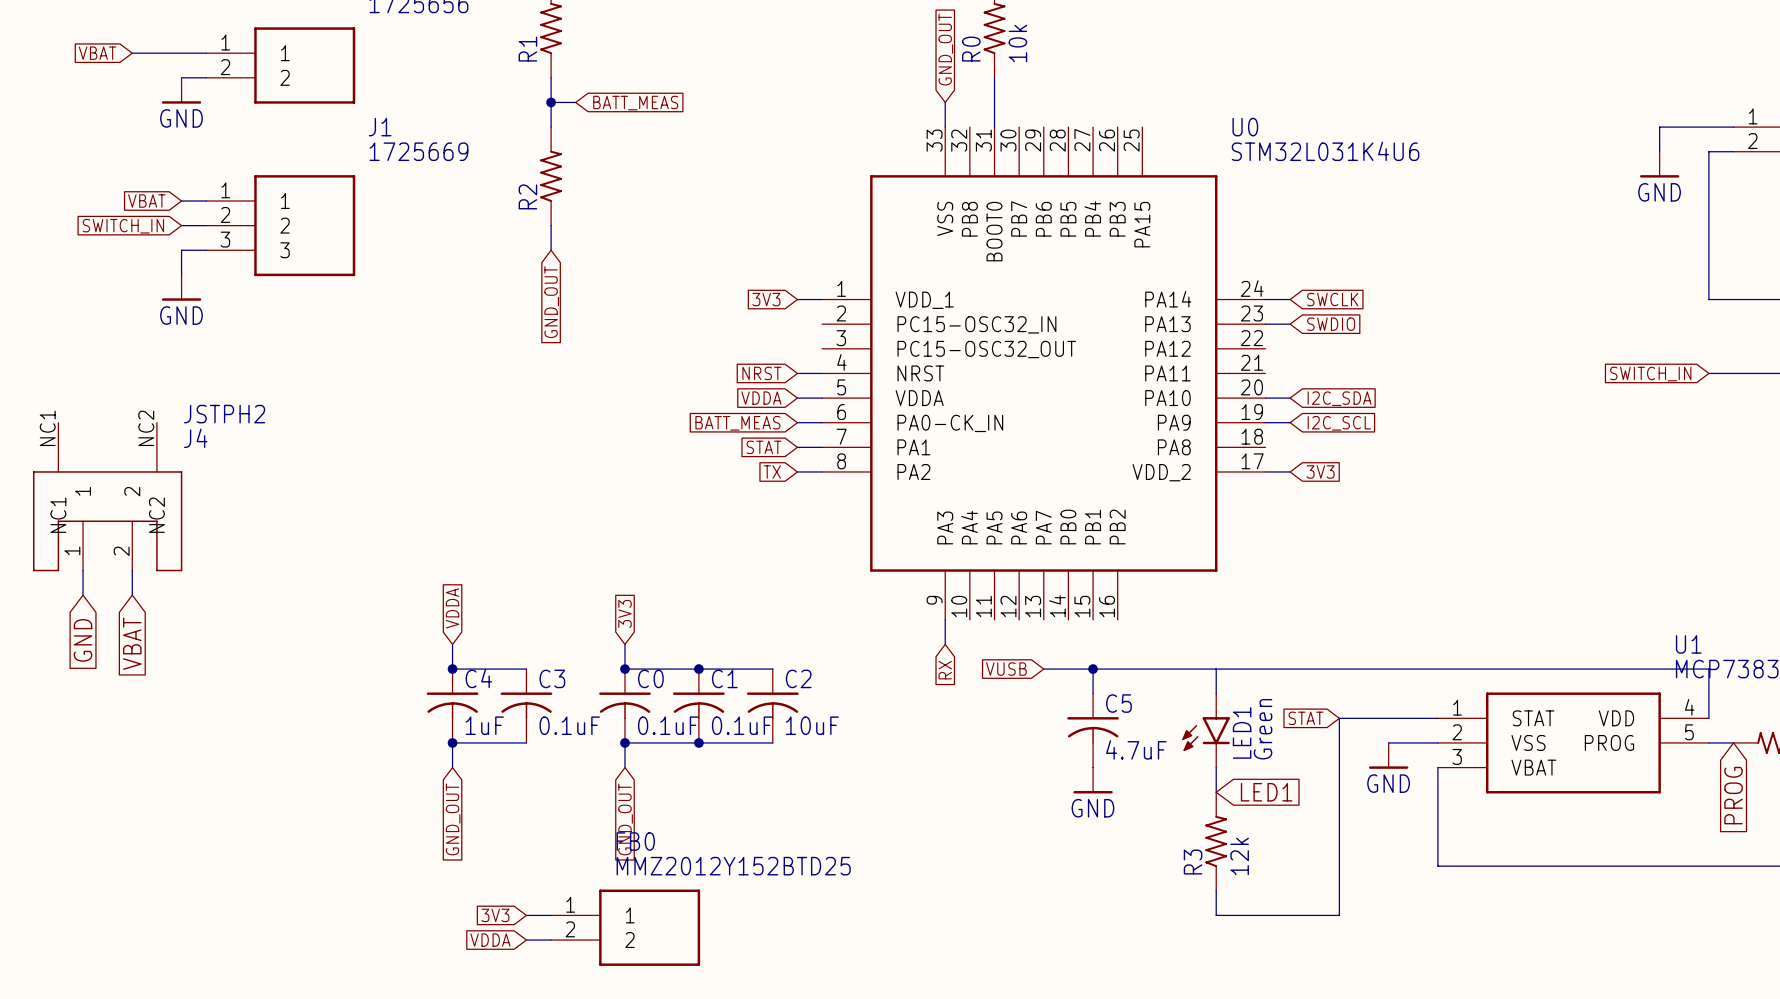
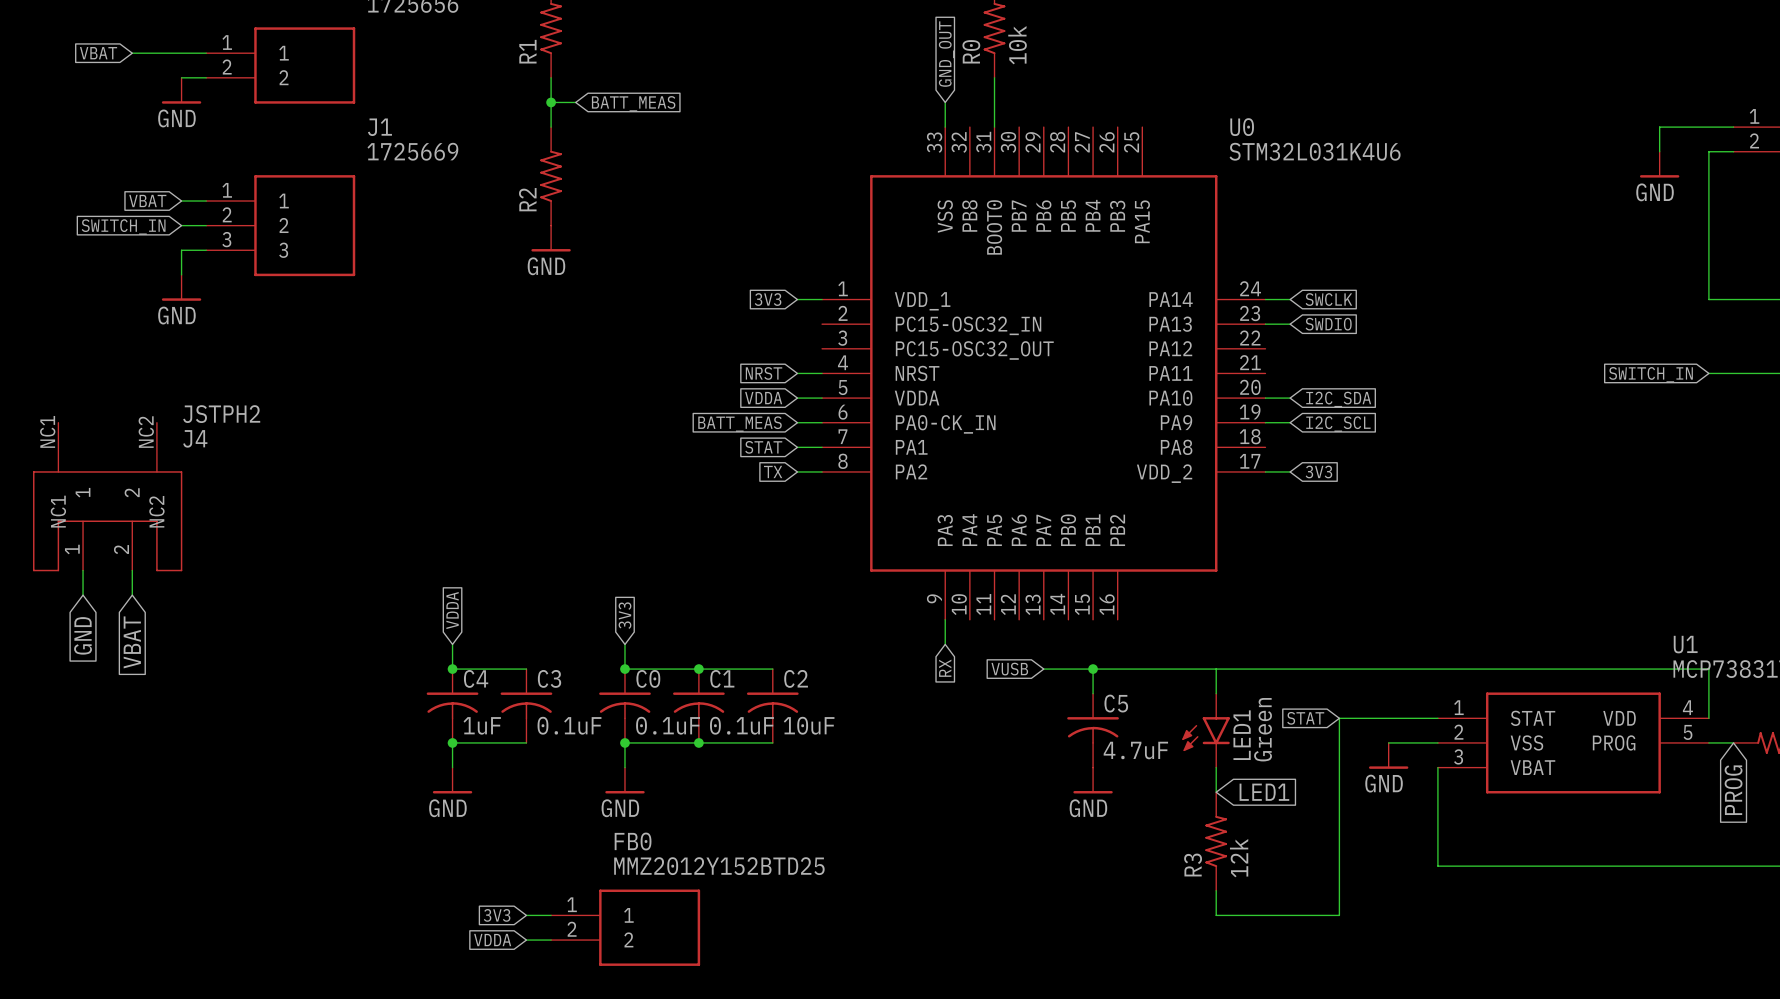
power symbol: none -> GND (551, 238)
global label: GND_OUT (551, 302) -> none
power symbol: none -> GND (452, 780)
power symbol: none -> GND (624, 780)
global label: GND_OUT (453, 819) -> none
global label: GND_OUT (625, 819) -> none

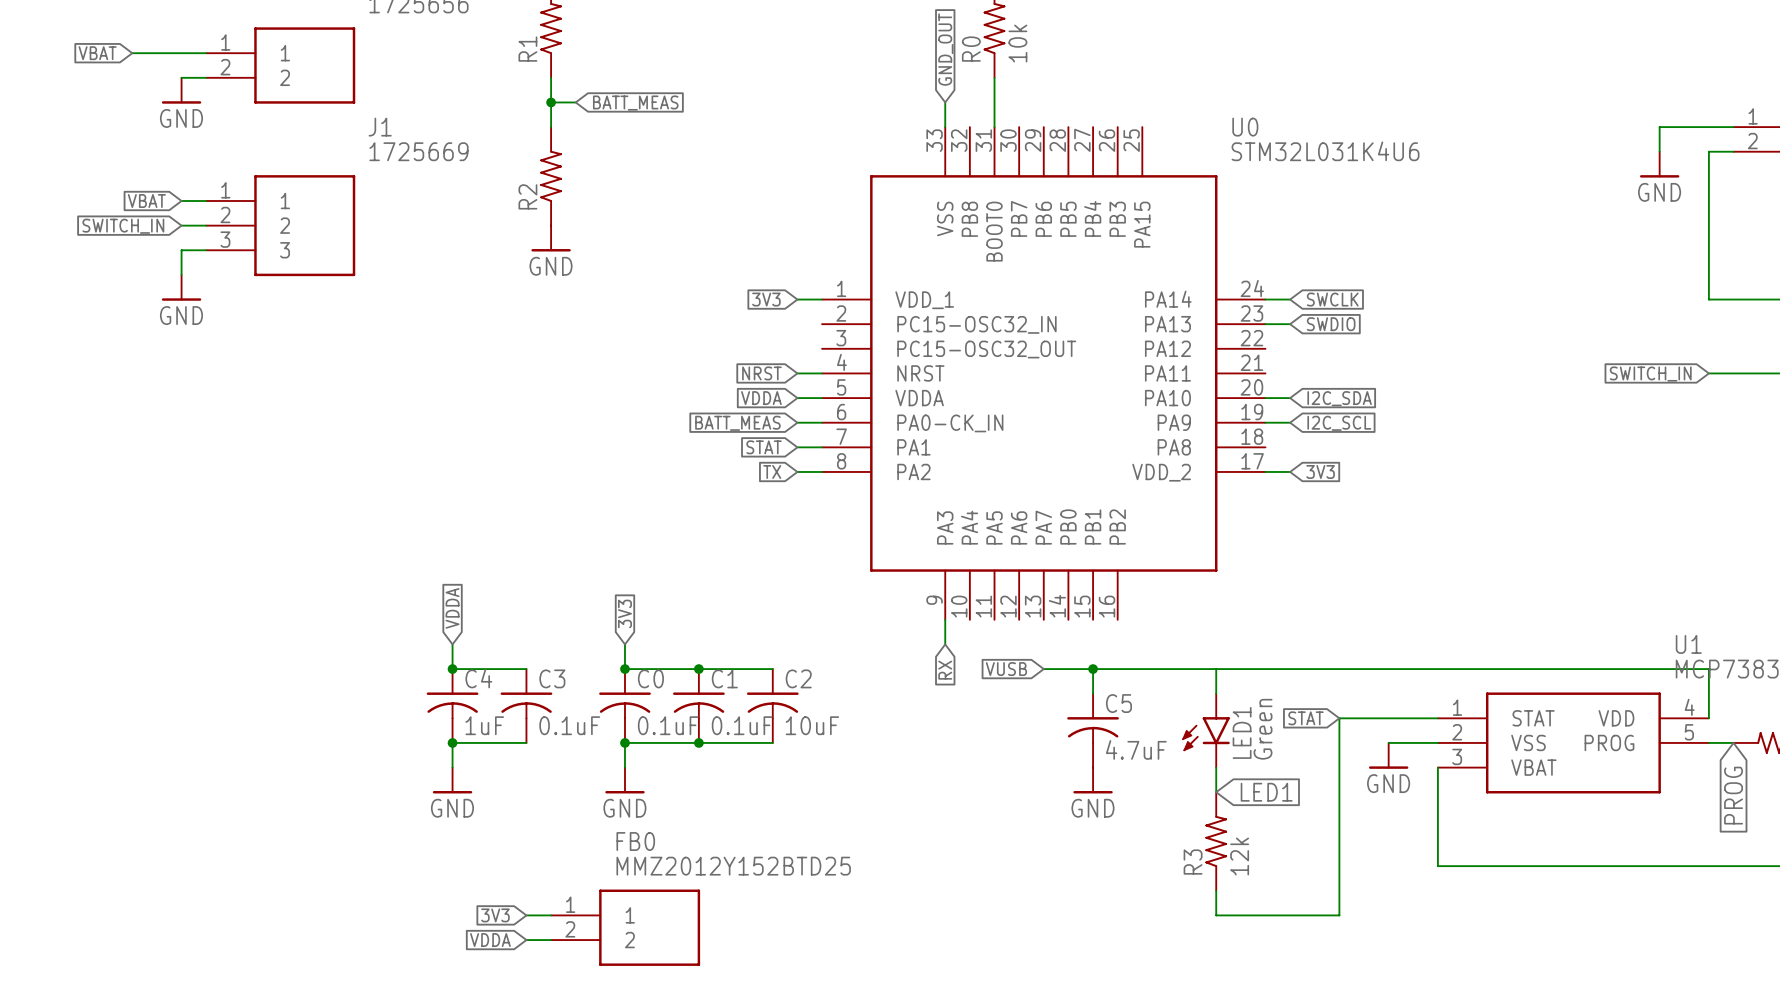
J4: JSTPH2 (107, 496) -> none
wire: (83, 570) (83, 595) -> none
wire: (132, 570) (132, 595) -> none
global label: GND (83, 635) -> none
global label: VBAT (132, 642) -> none

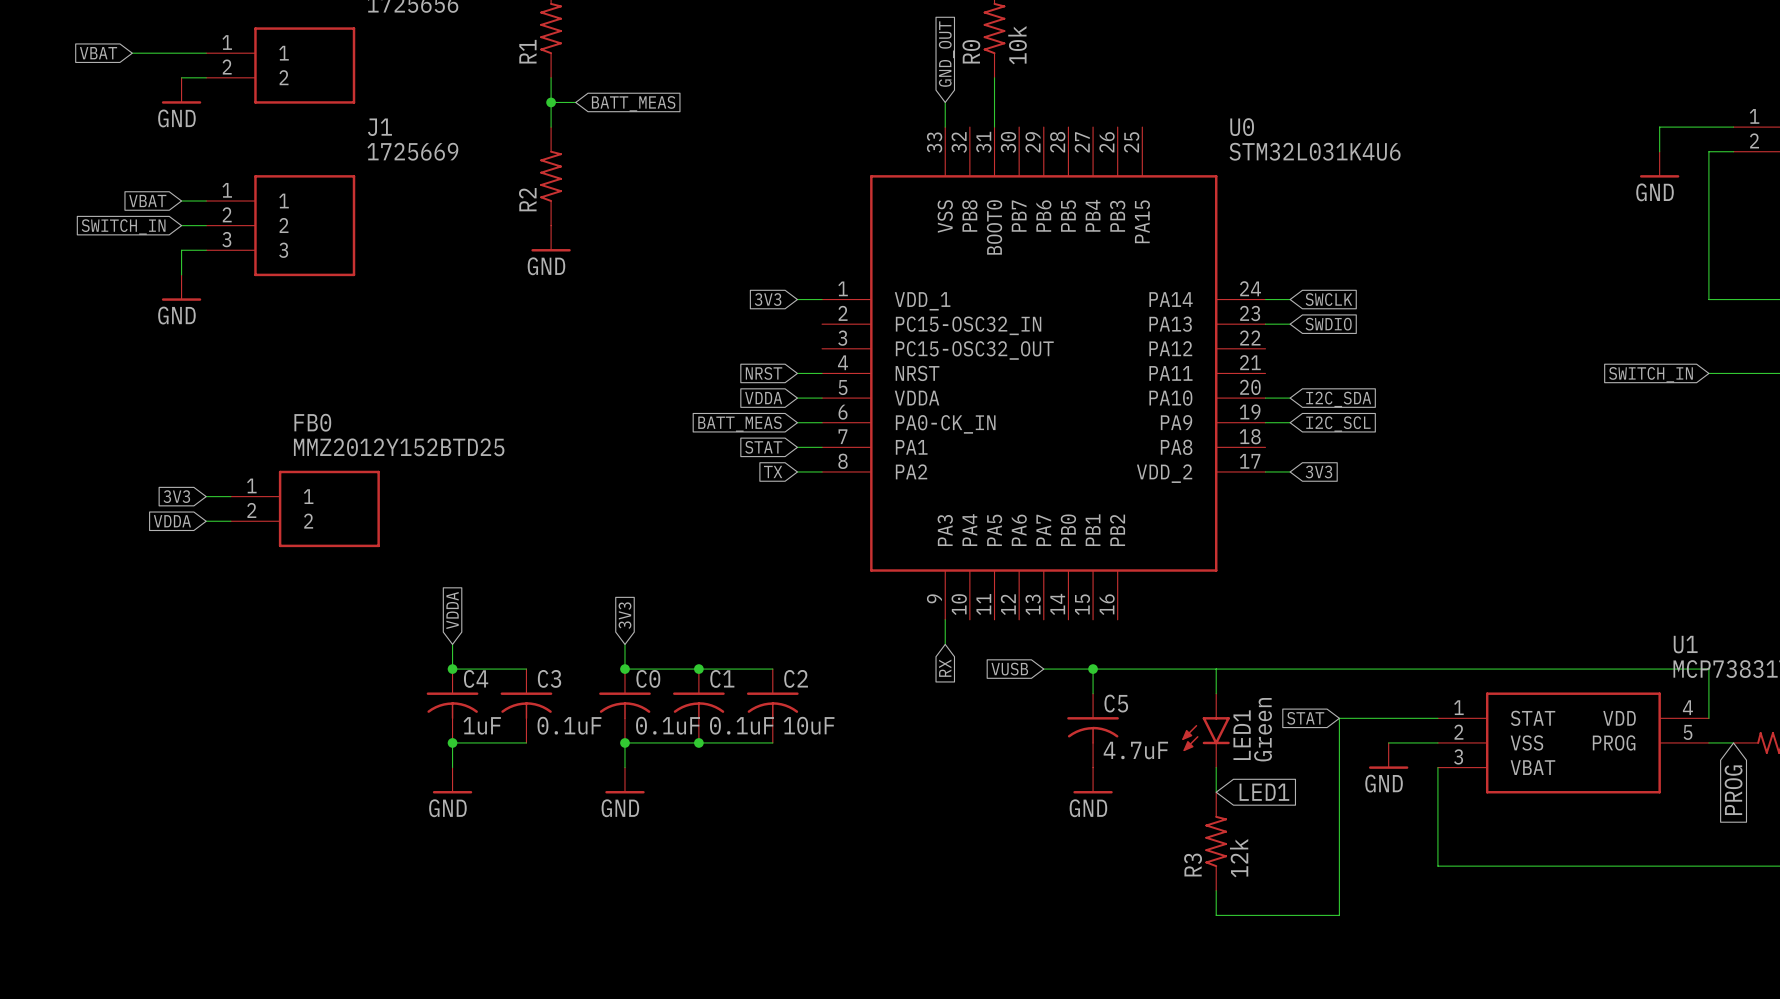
global label: none -> 3V3 (176, 496)
wire: none -> (206, 496) (230, 496)
global label: none -> VDDA (172, 521)
wire: none -> (206, 521) (230, 521)
global label: 3V3 (495, 915) -> none
wire: (526, 915) (551, 915) -> none
FB0 position: (625, 927) -> (305, 508)
global label: VDDA (490, 940) -> none
wire: (526, 940) (551, 940) -> none

